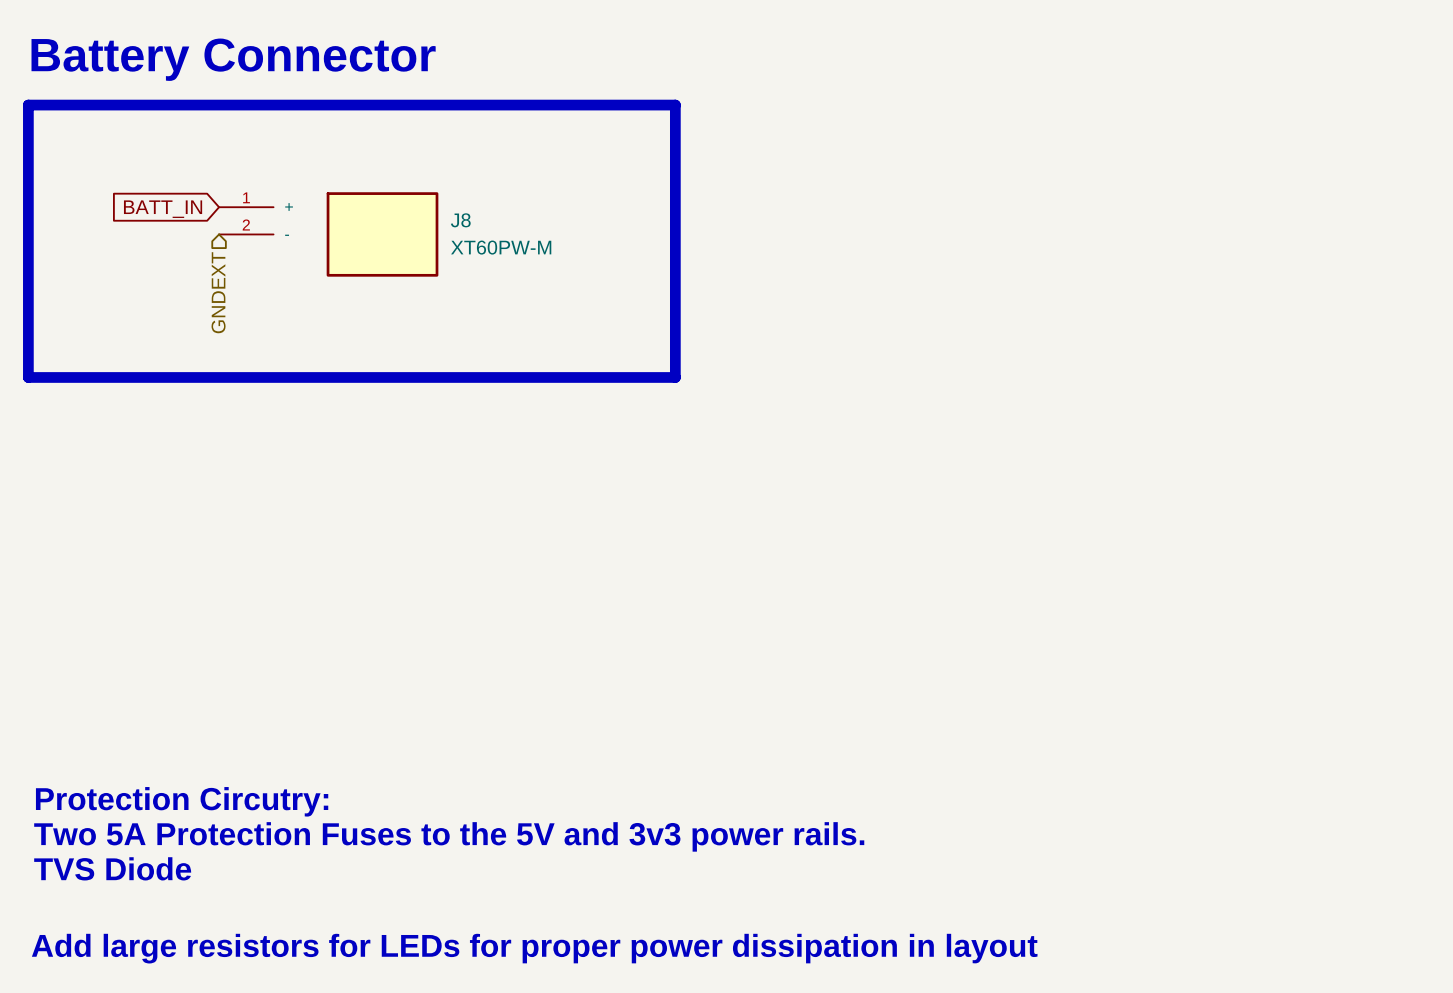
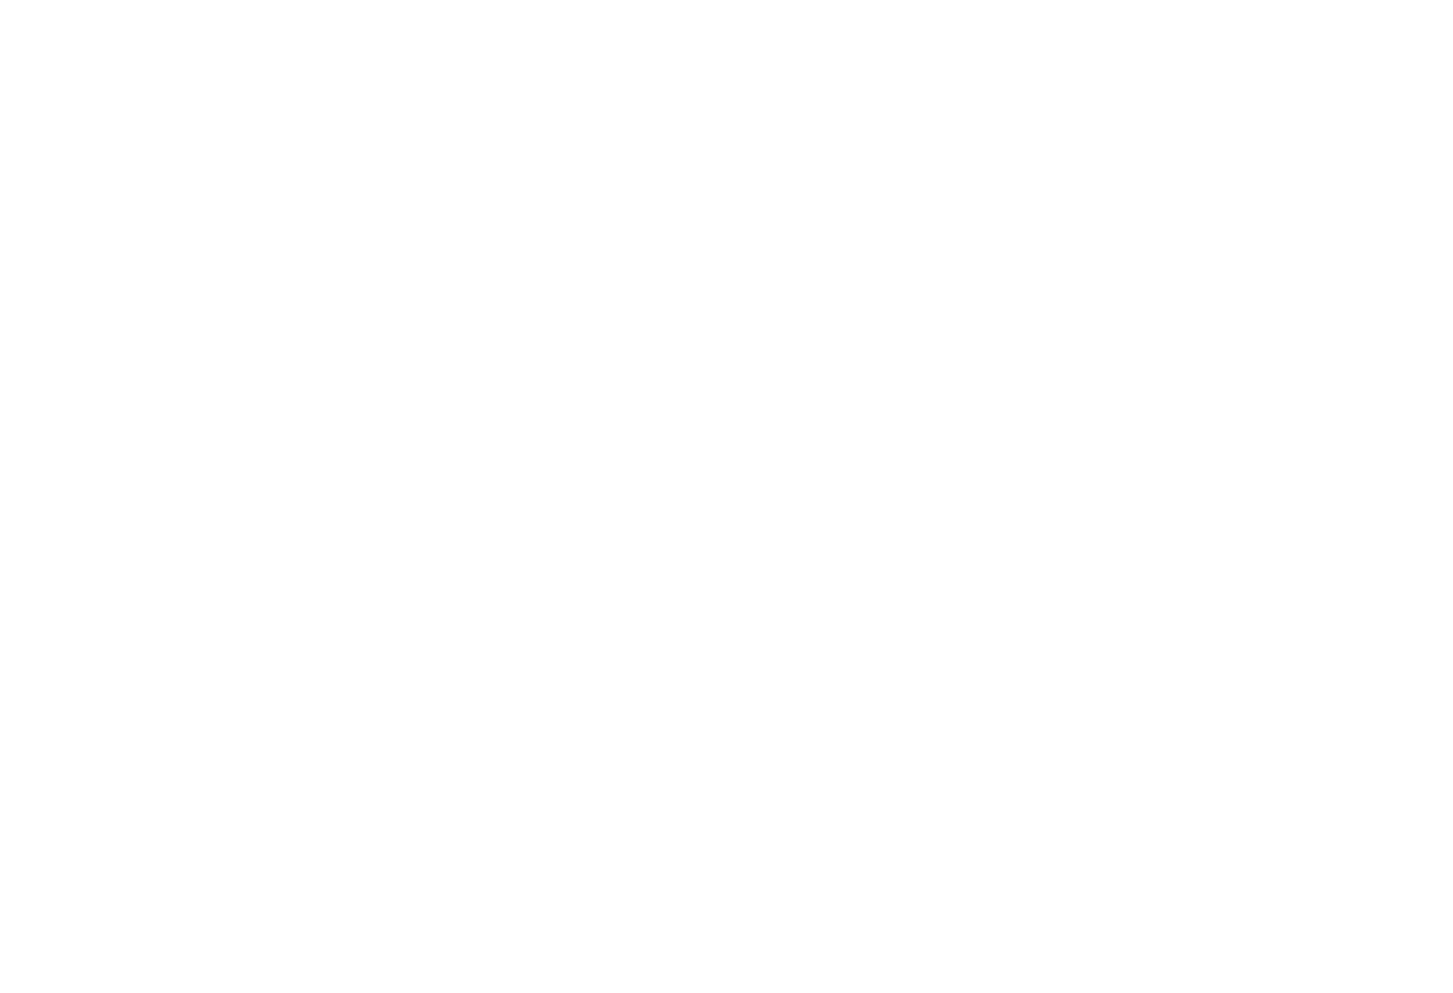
text: Battery Connector (233, 59) -> none
line: (28, 105) (675, 105) (675, 377) (28, 377) (28, 105) -> none
global label: BATT_IN (163, 209) -> none
J8: XT60PW-M (328, 234) -> none
hierarchical label: GNDEXT (218, 292) -> none
text: Protection Circutry: (182, 801) -> none
text: Two 5A Protection Fuses to the 5V and 3v3 power rails. (449, 836) -> none
text: TVS Diode (112, 868) -> none
text: Add large resistors for LEDs for proper power dissipation in layout (534, 948) -> none

